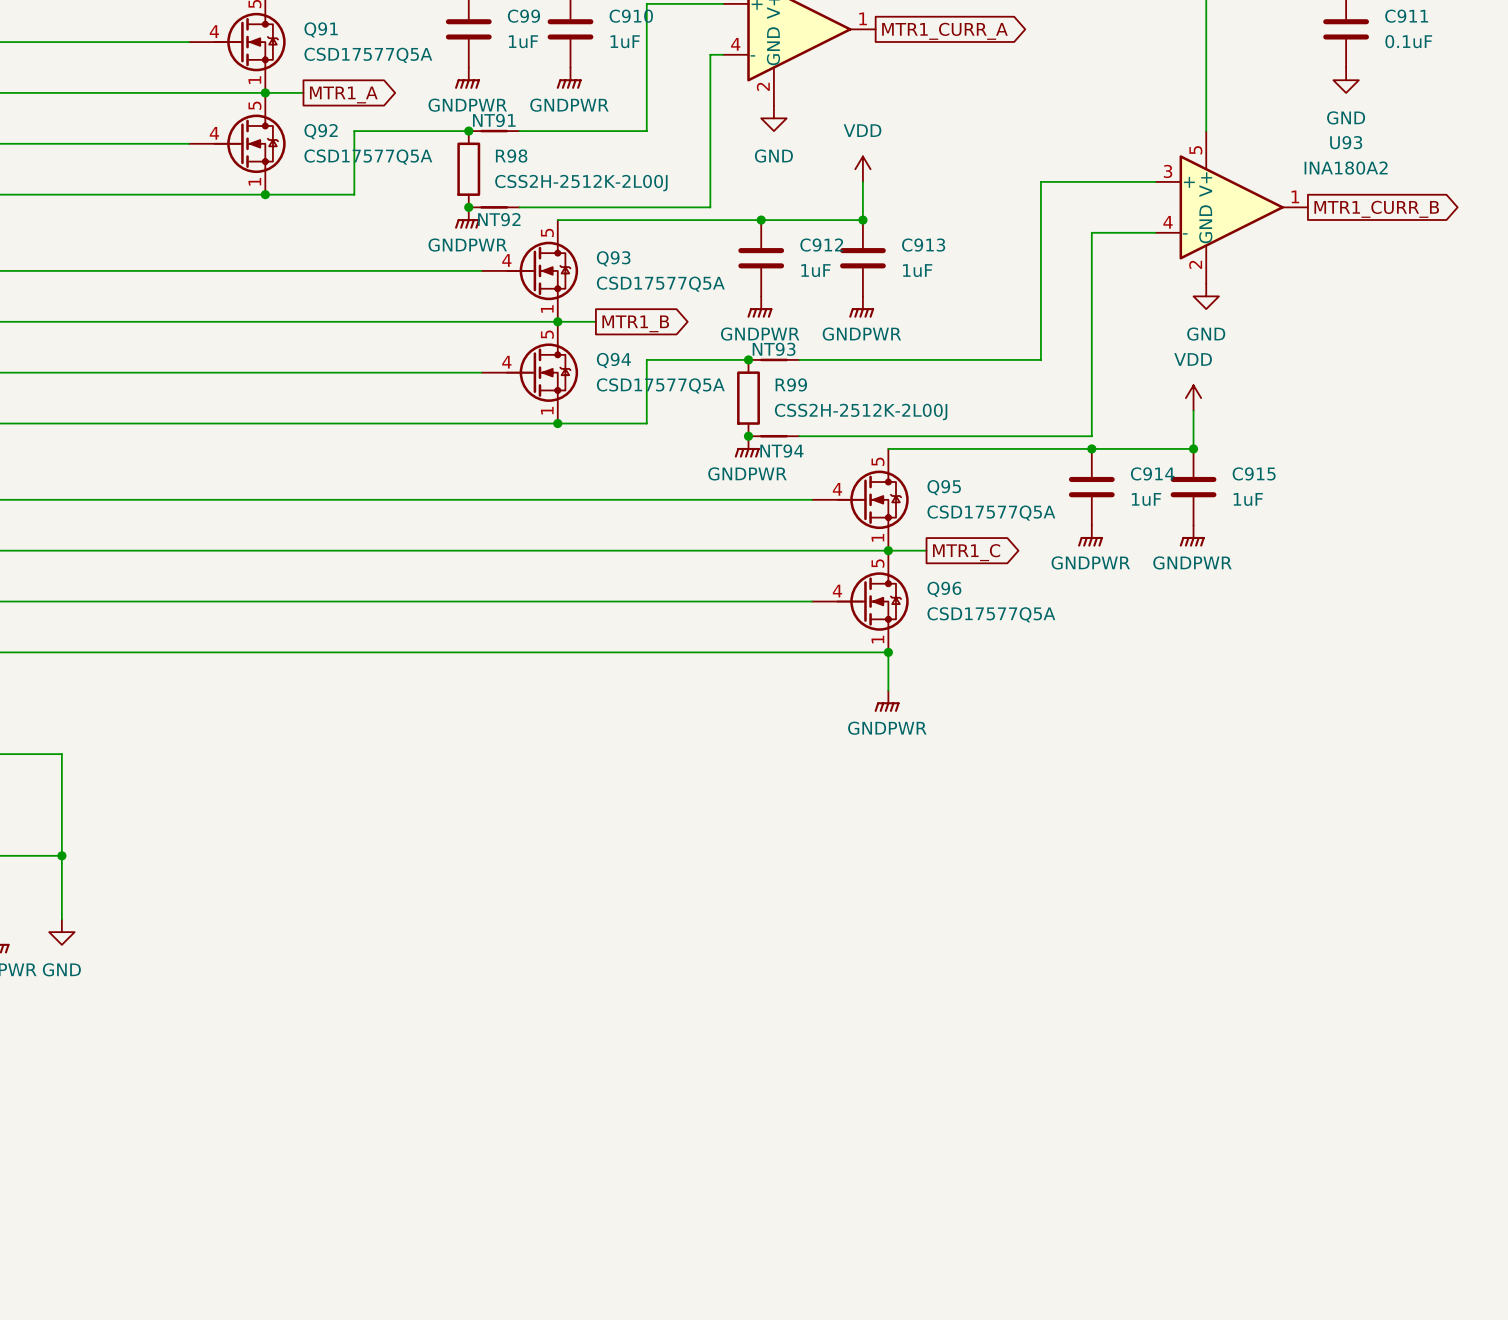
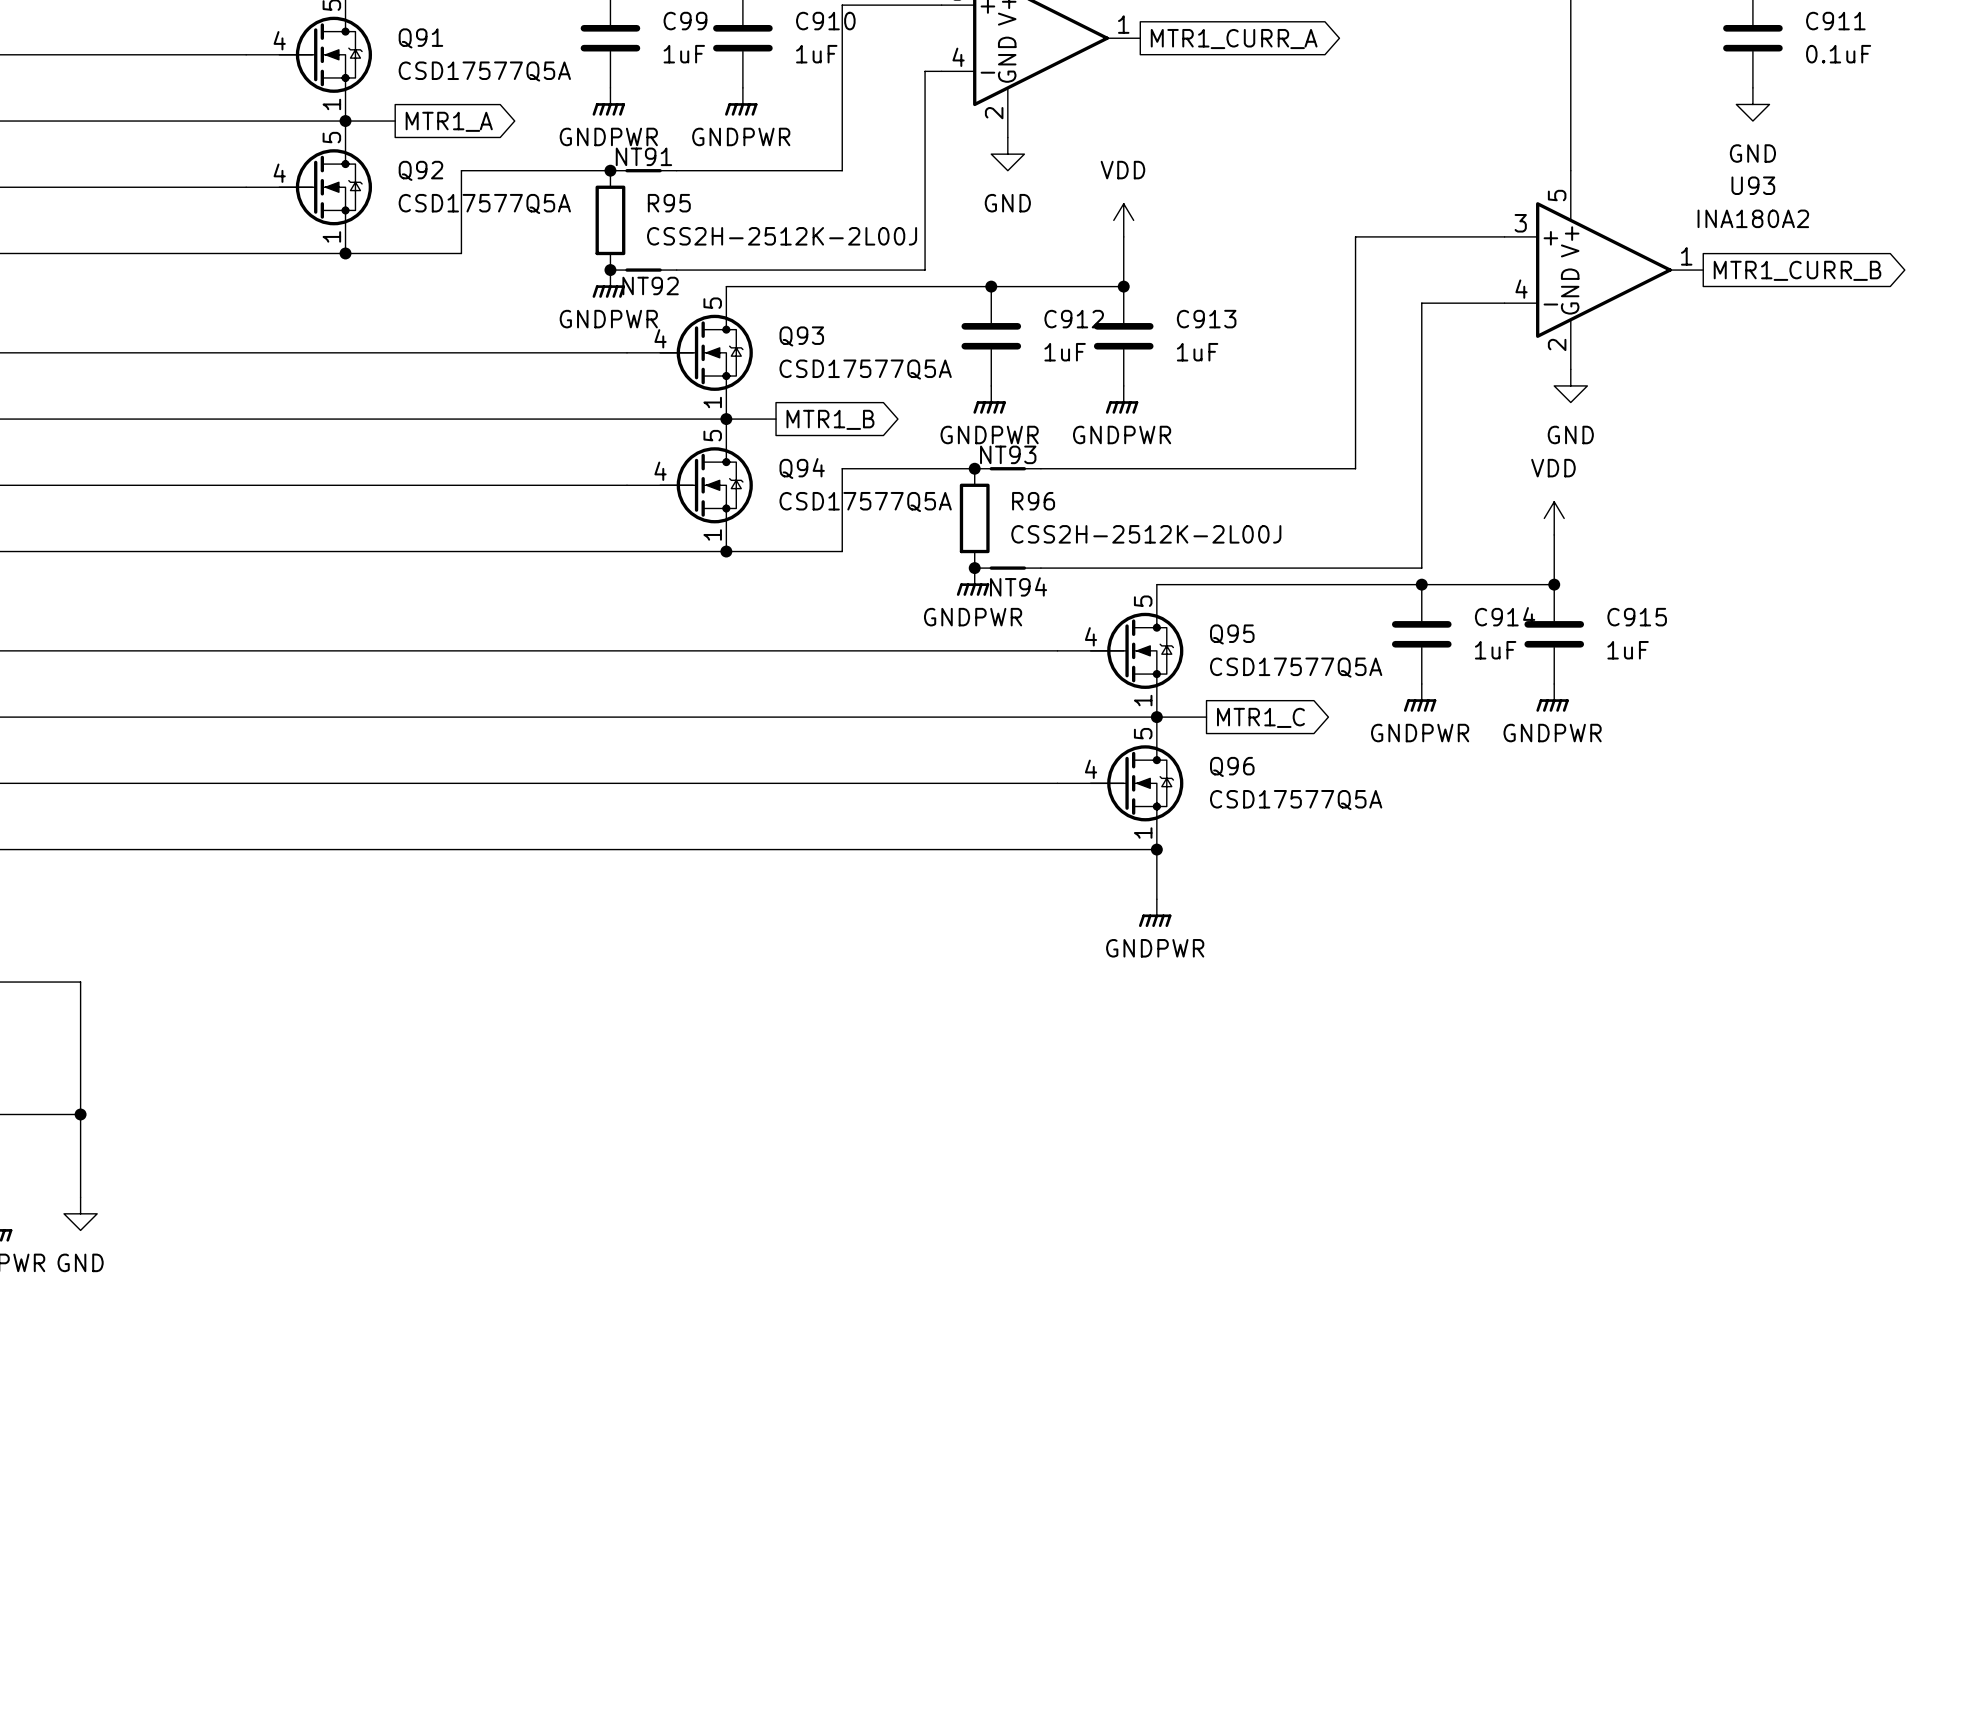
R98 name: R98 (511, 156) -> R95 (669, 203)
R99 name: R99 (791, 384) -> R96 (1033, 501)

